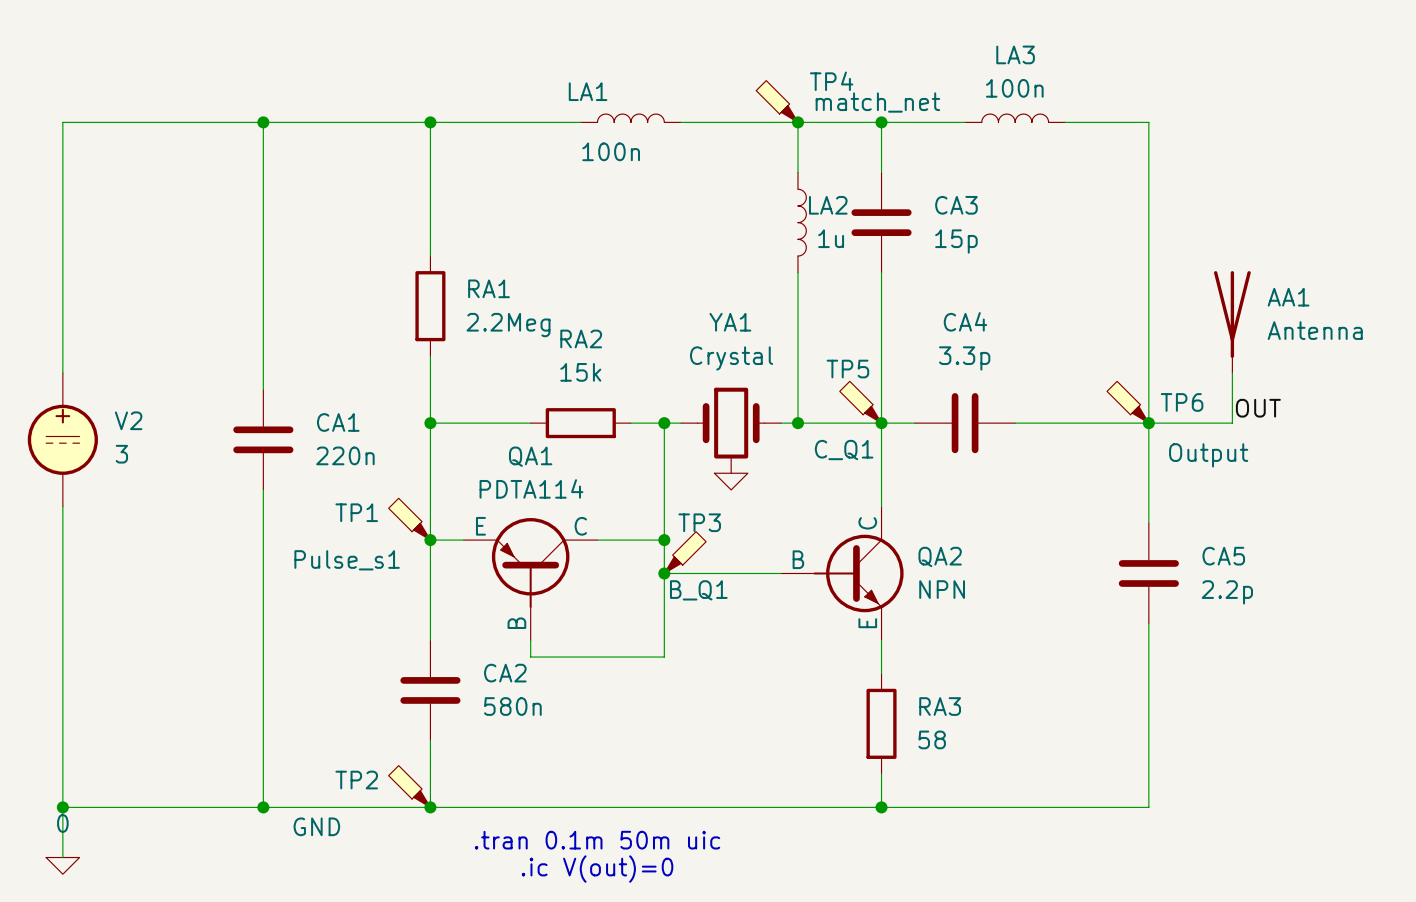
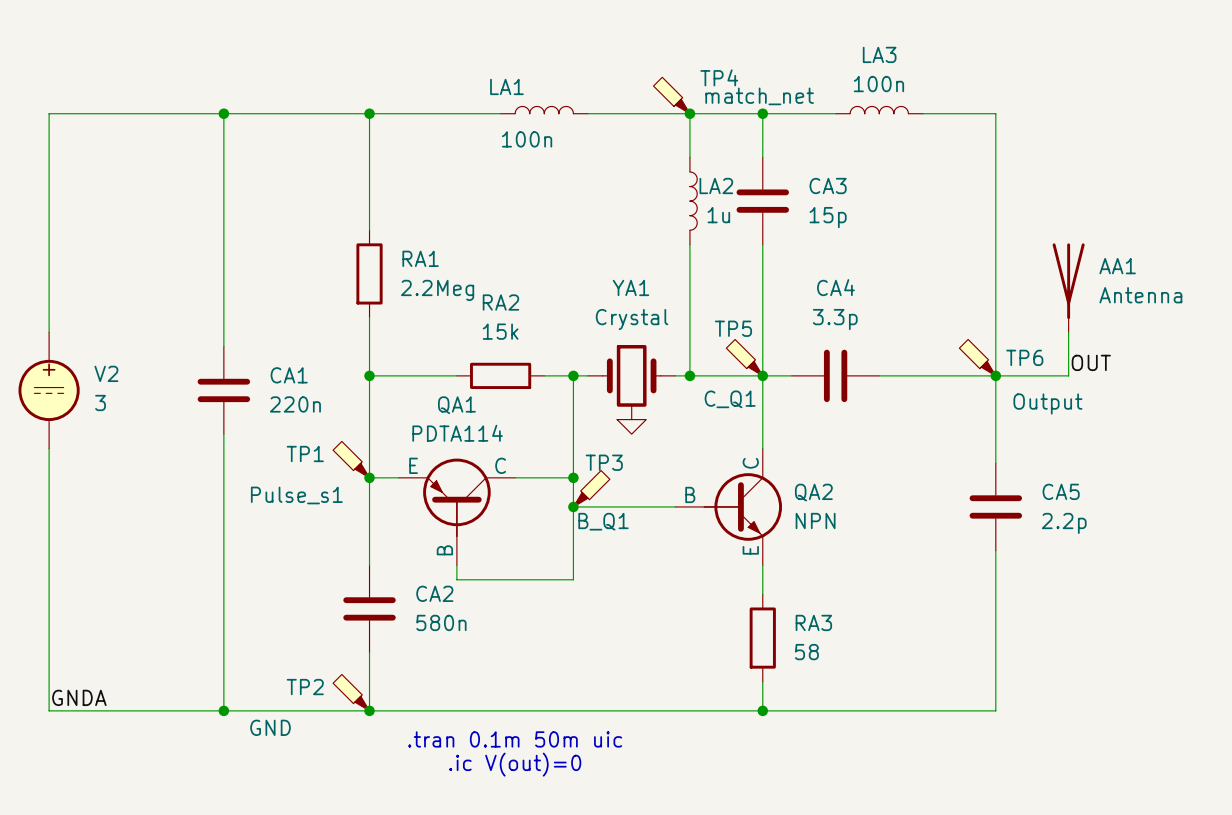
label: none -> GNDA (79, 697)
wire: (62, 807) (62, 857) -> none
junction: (62, 807) -> none
power symbol: 0 (62, 865) -> none

